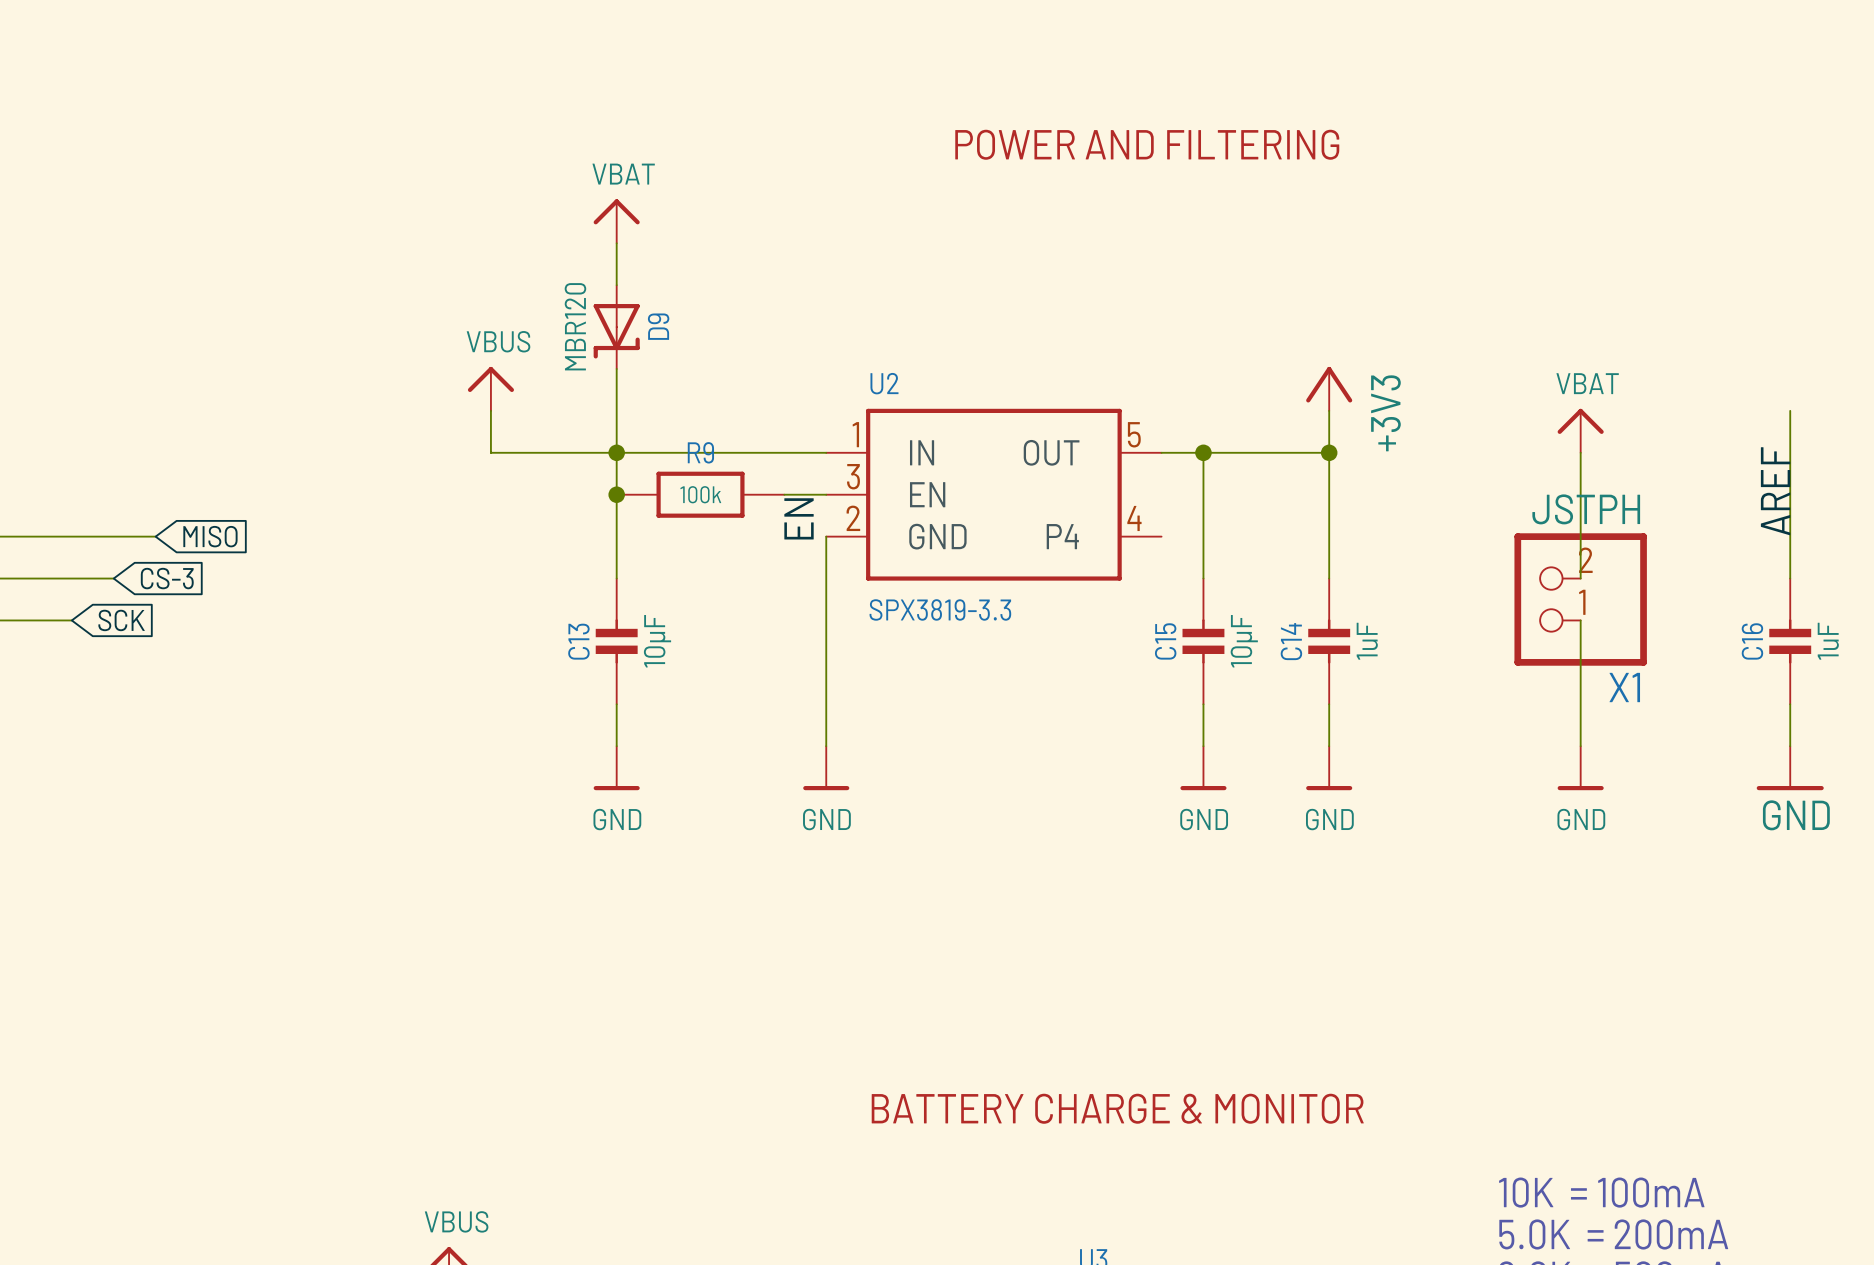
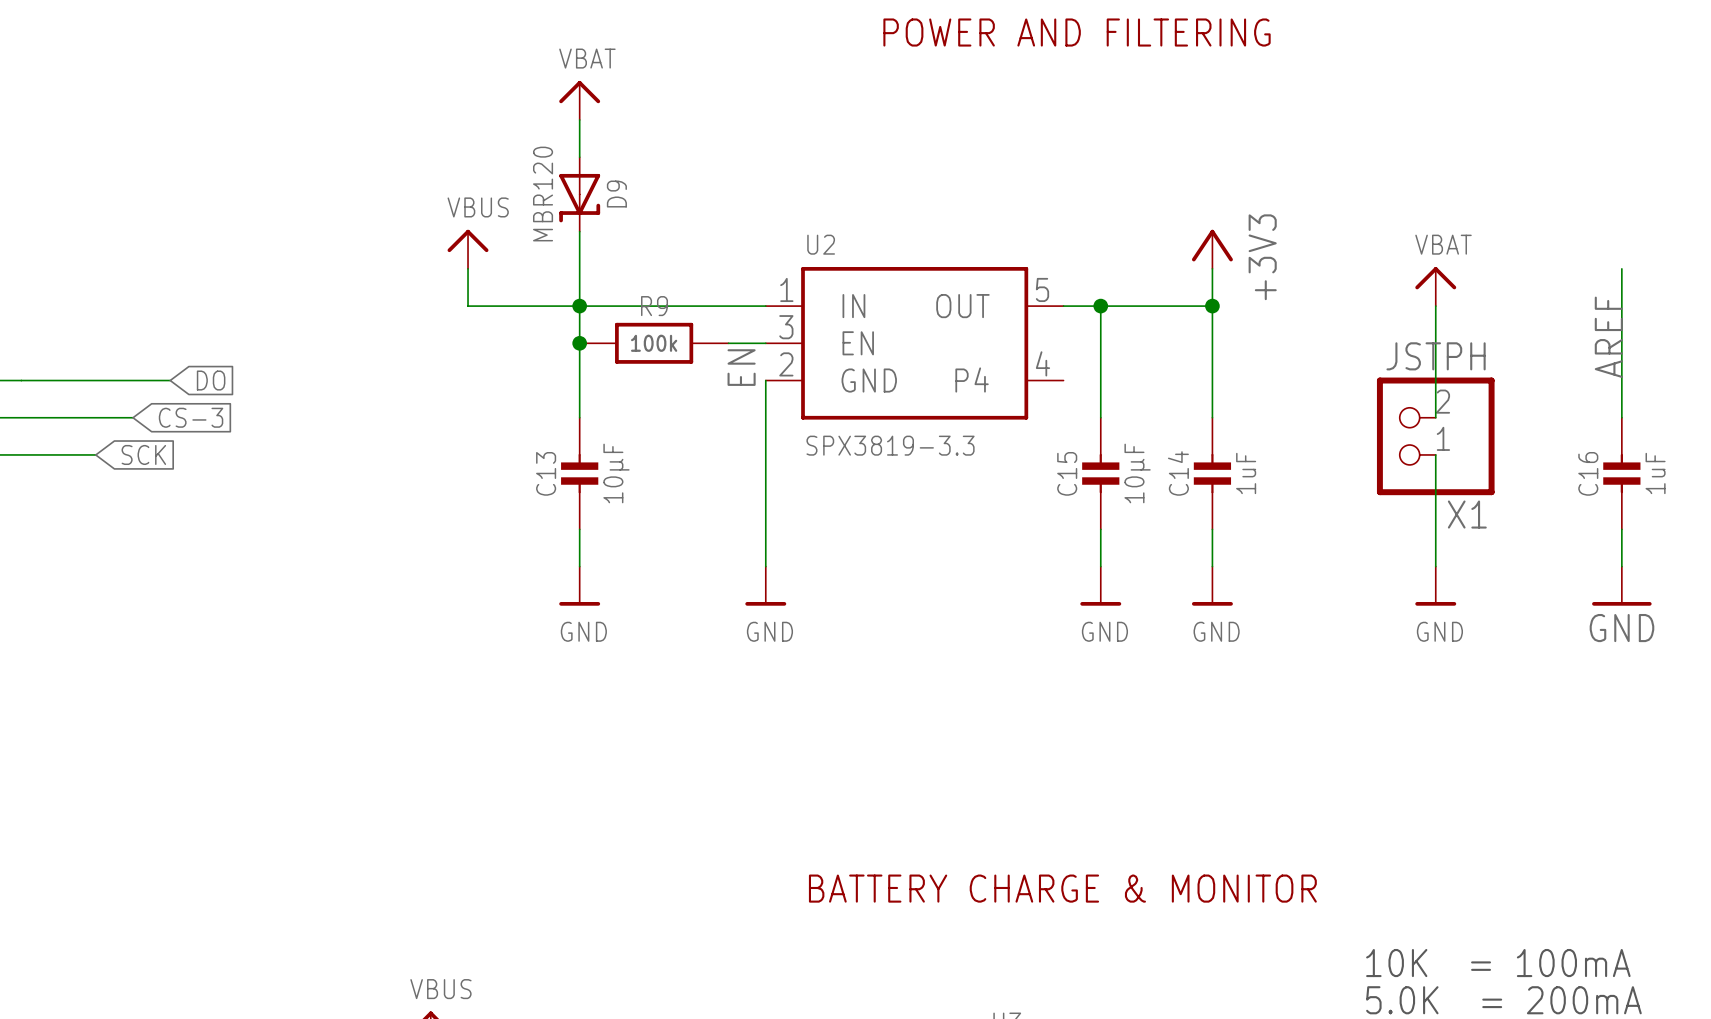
global label: MISO (210, 536) -> DO (211, 380)

